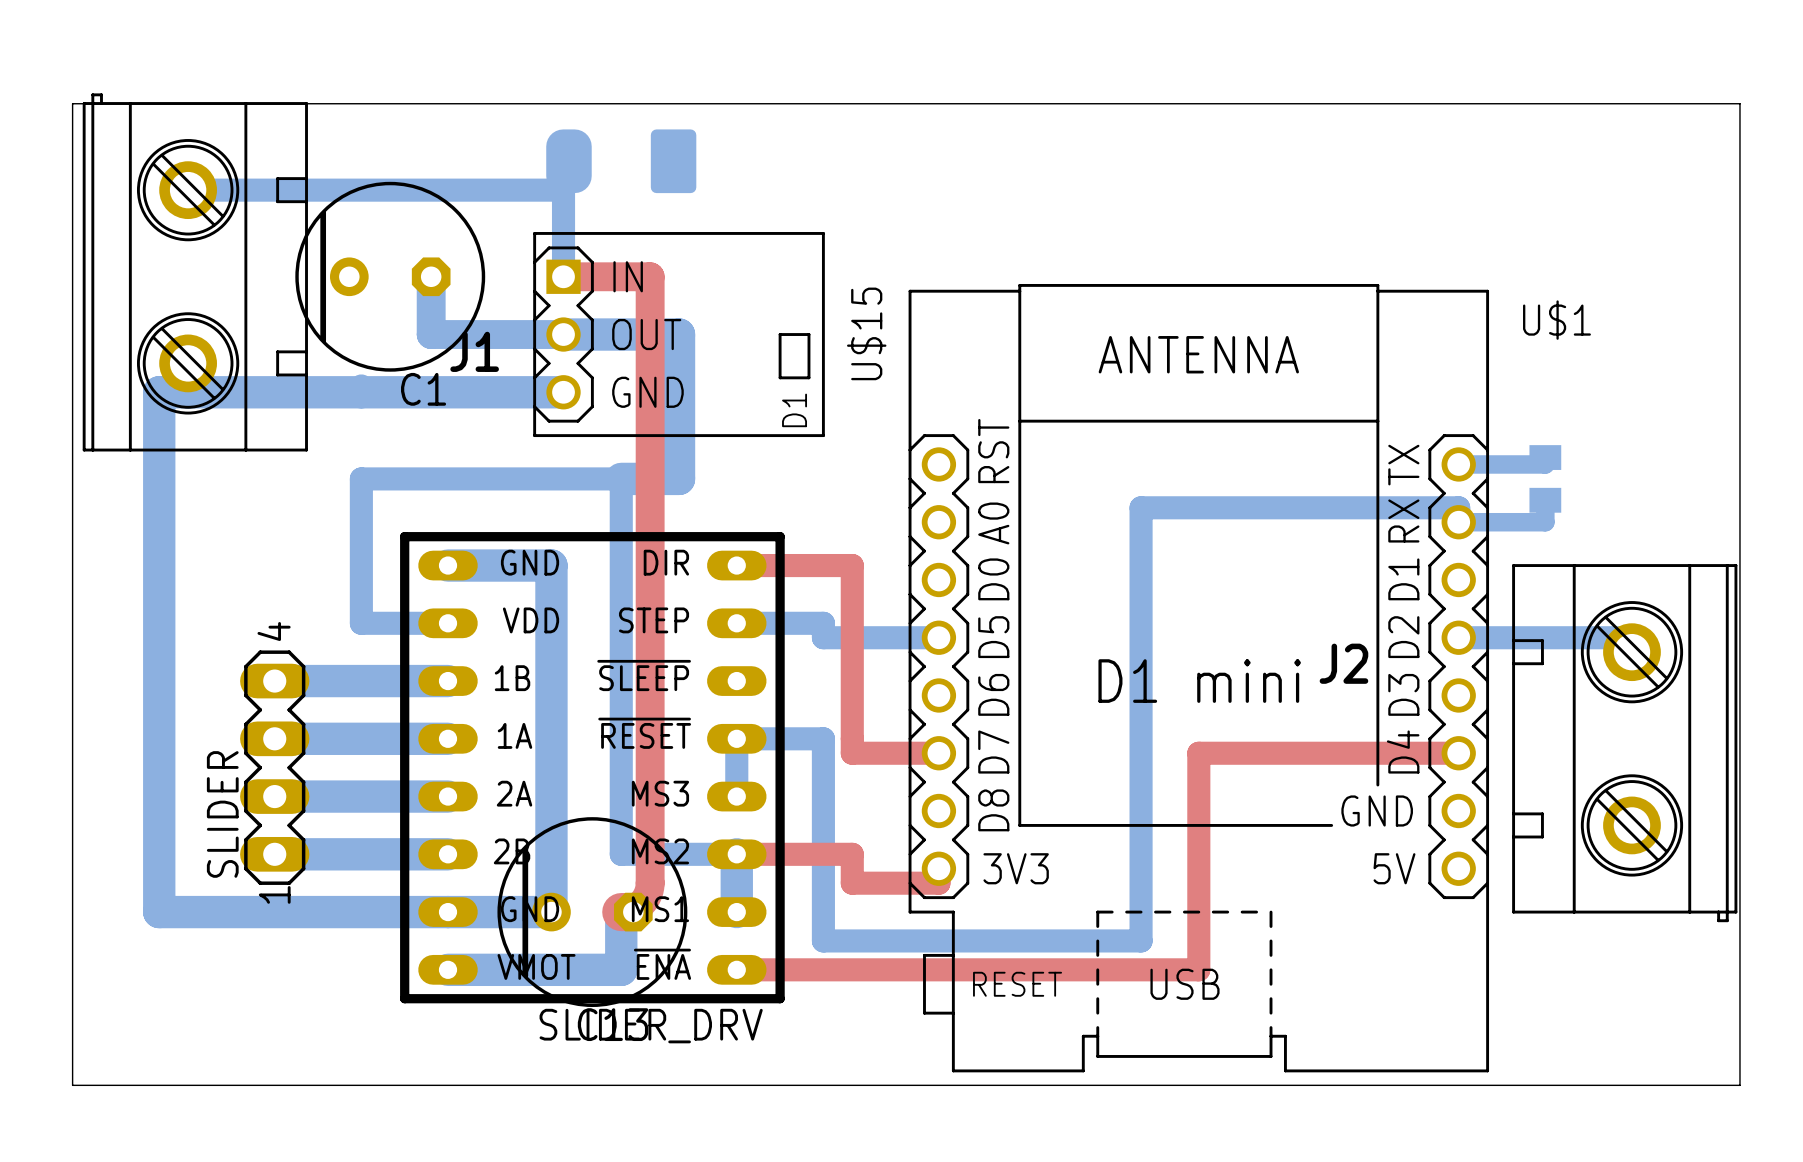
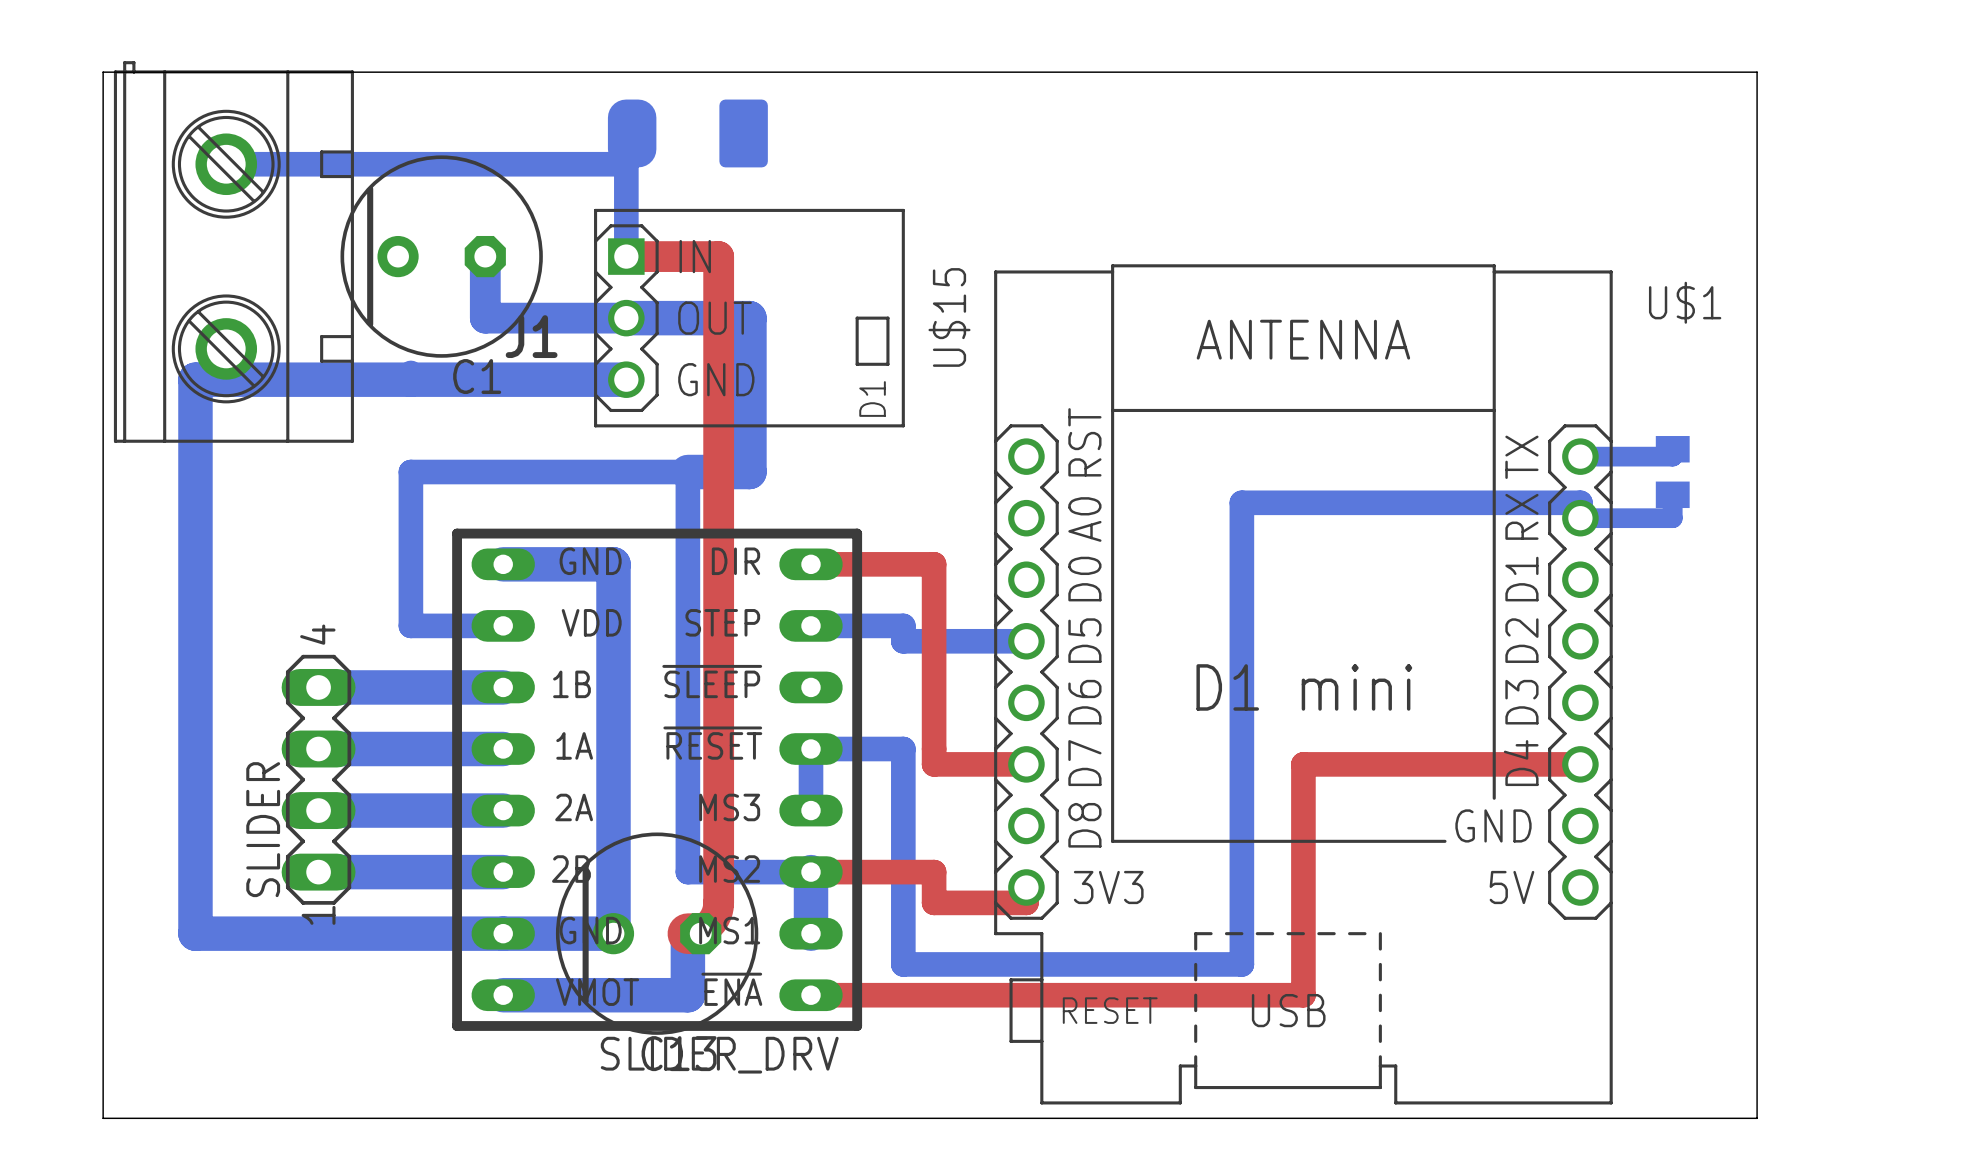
board edge: (1624, 103) (1739, 103) (1739, 1085) (1624, 1085) -> (1757, 72) (1757, 1118)
bottom track: (1458, 637) (1631, 637) (1631, 652) -> none
J2: (1624, 743) -> none

